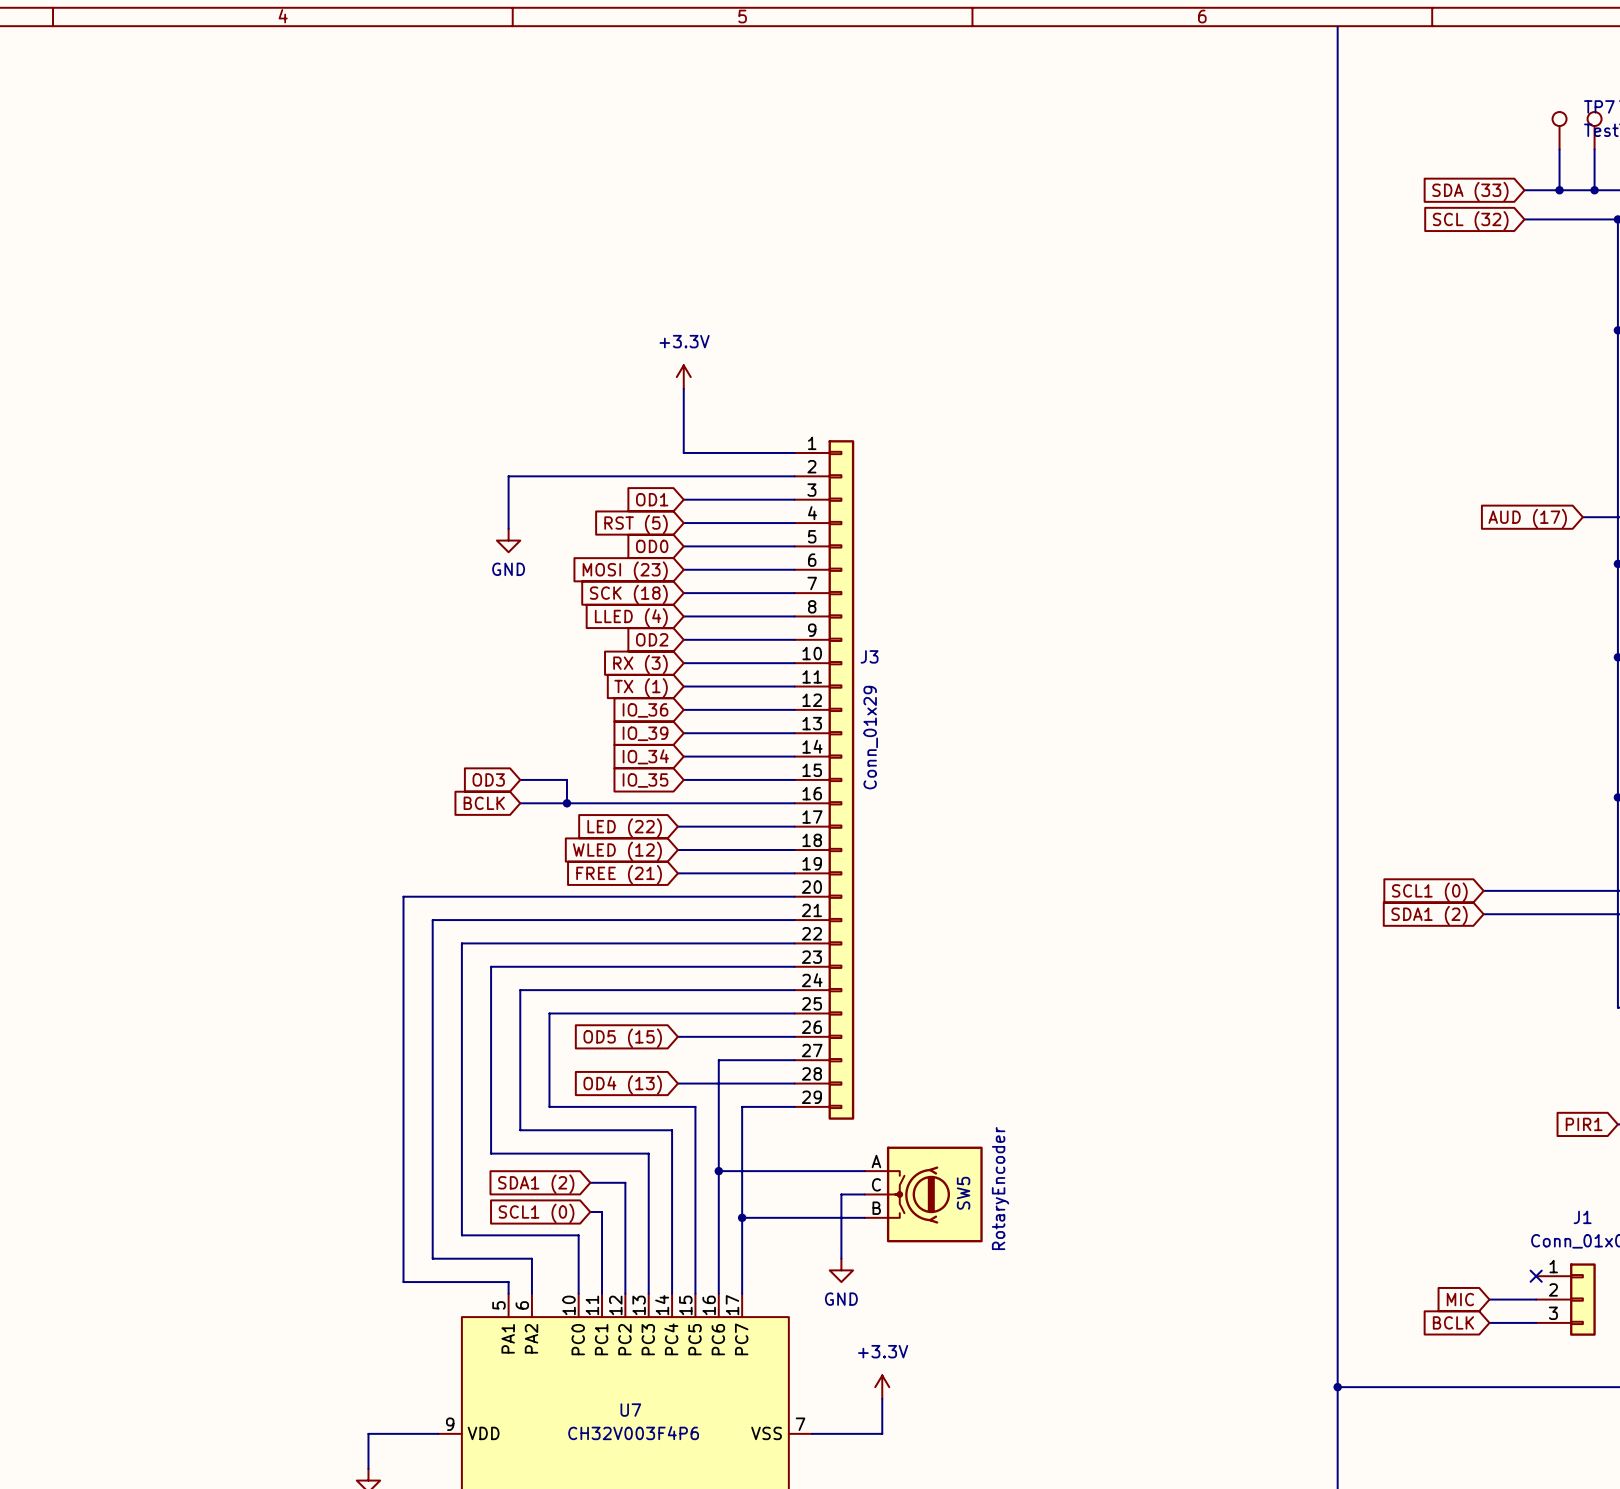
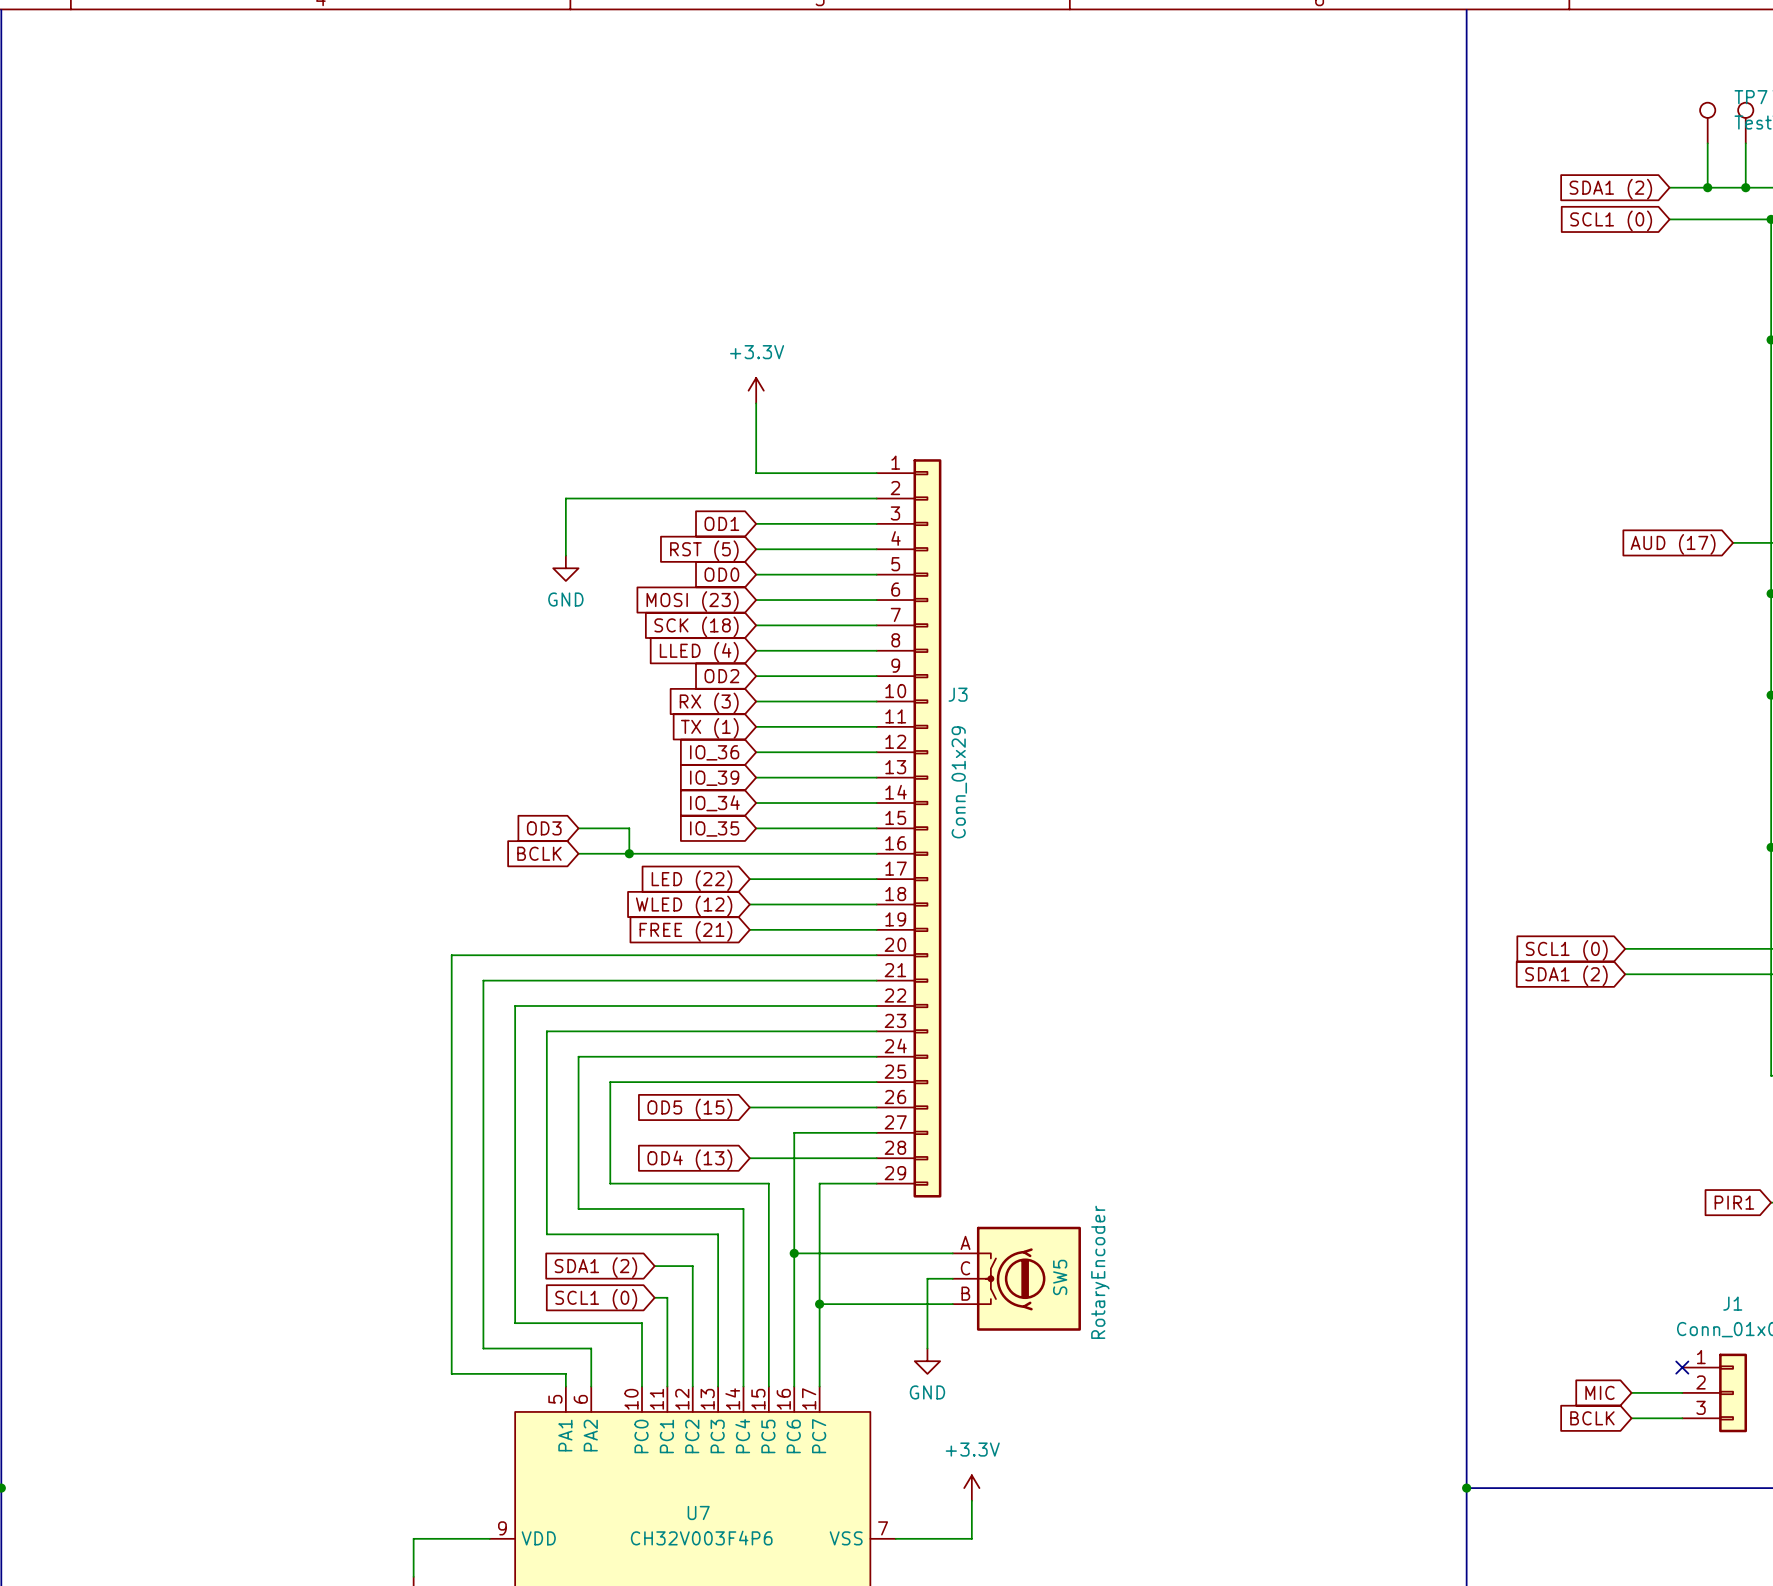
global label: SDA (33) (1470, 191) -> SDA1 (2) (1610, 189)
global label: SCL (32) (1470, 220) -> SCL1 (0) (1611, 220)

